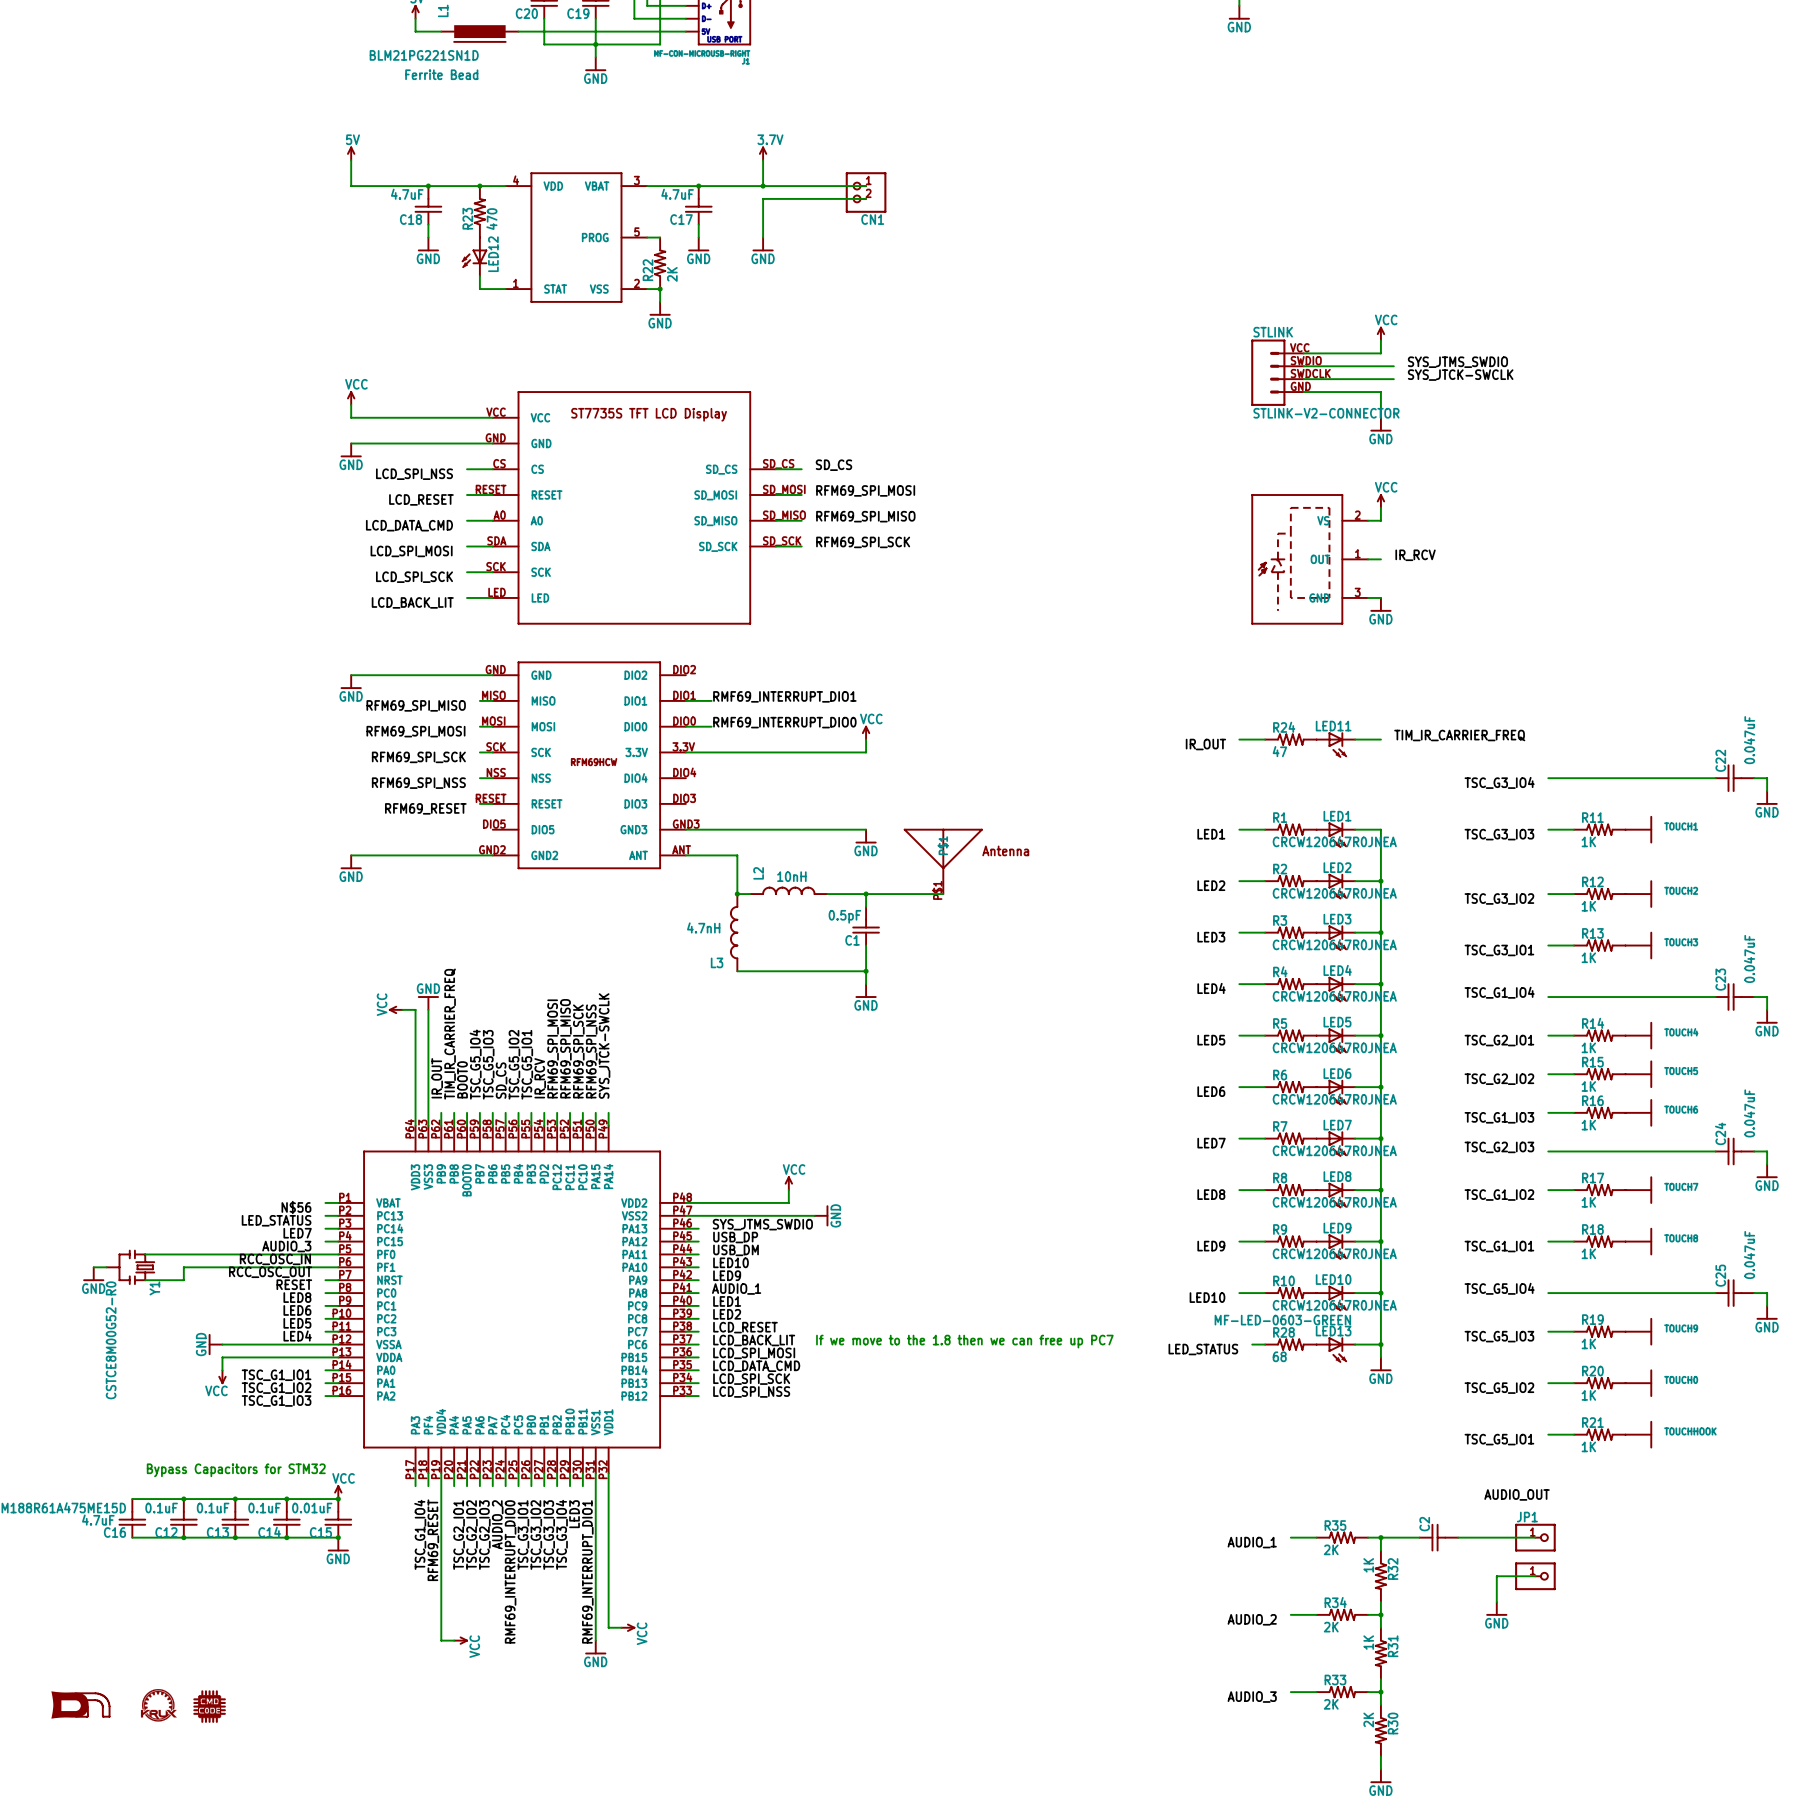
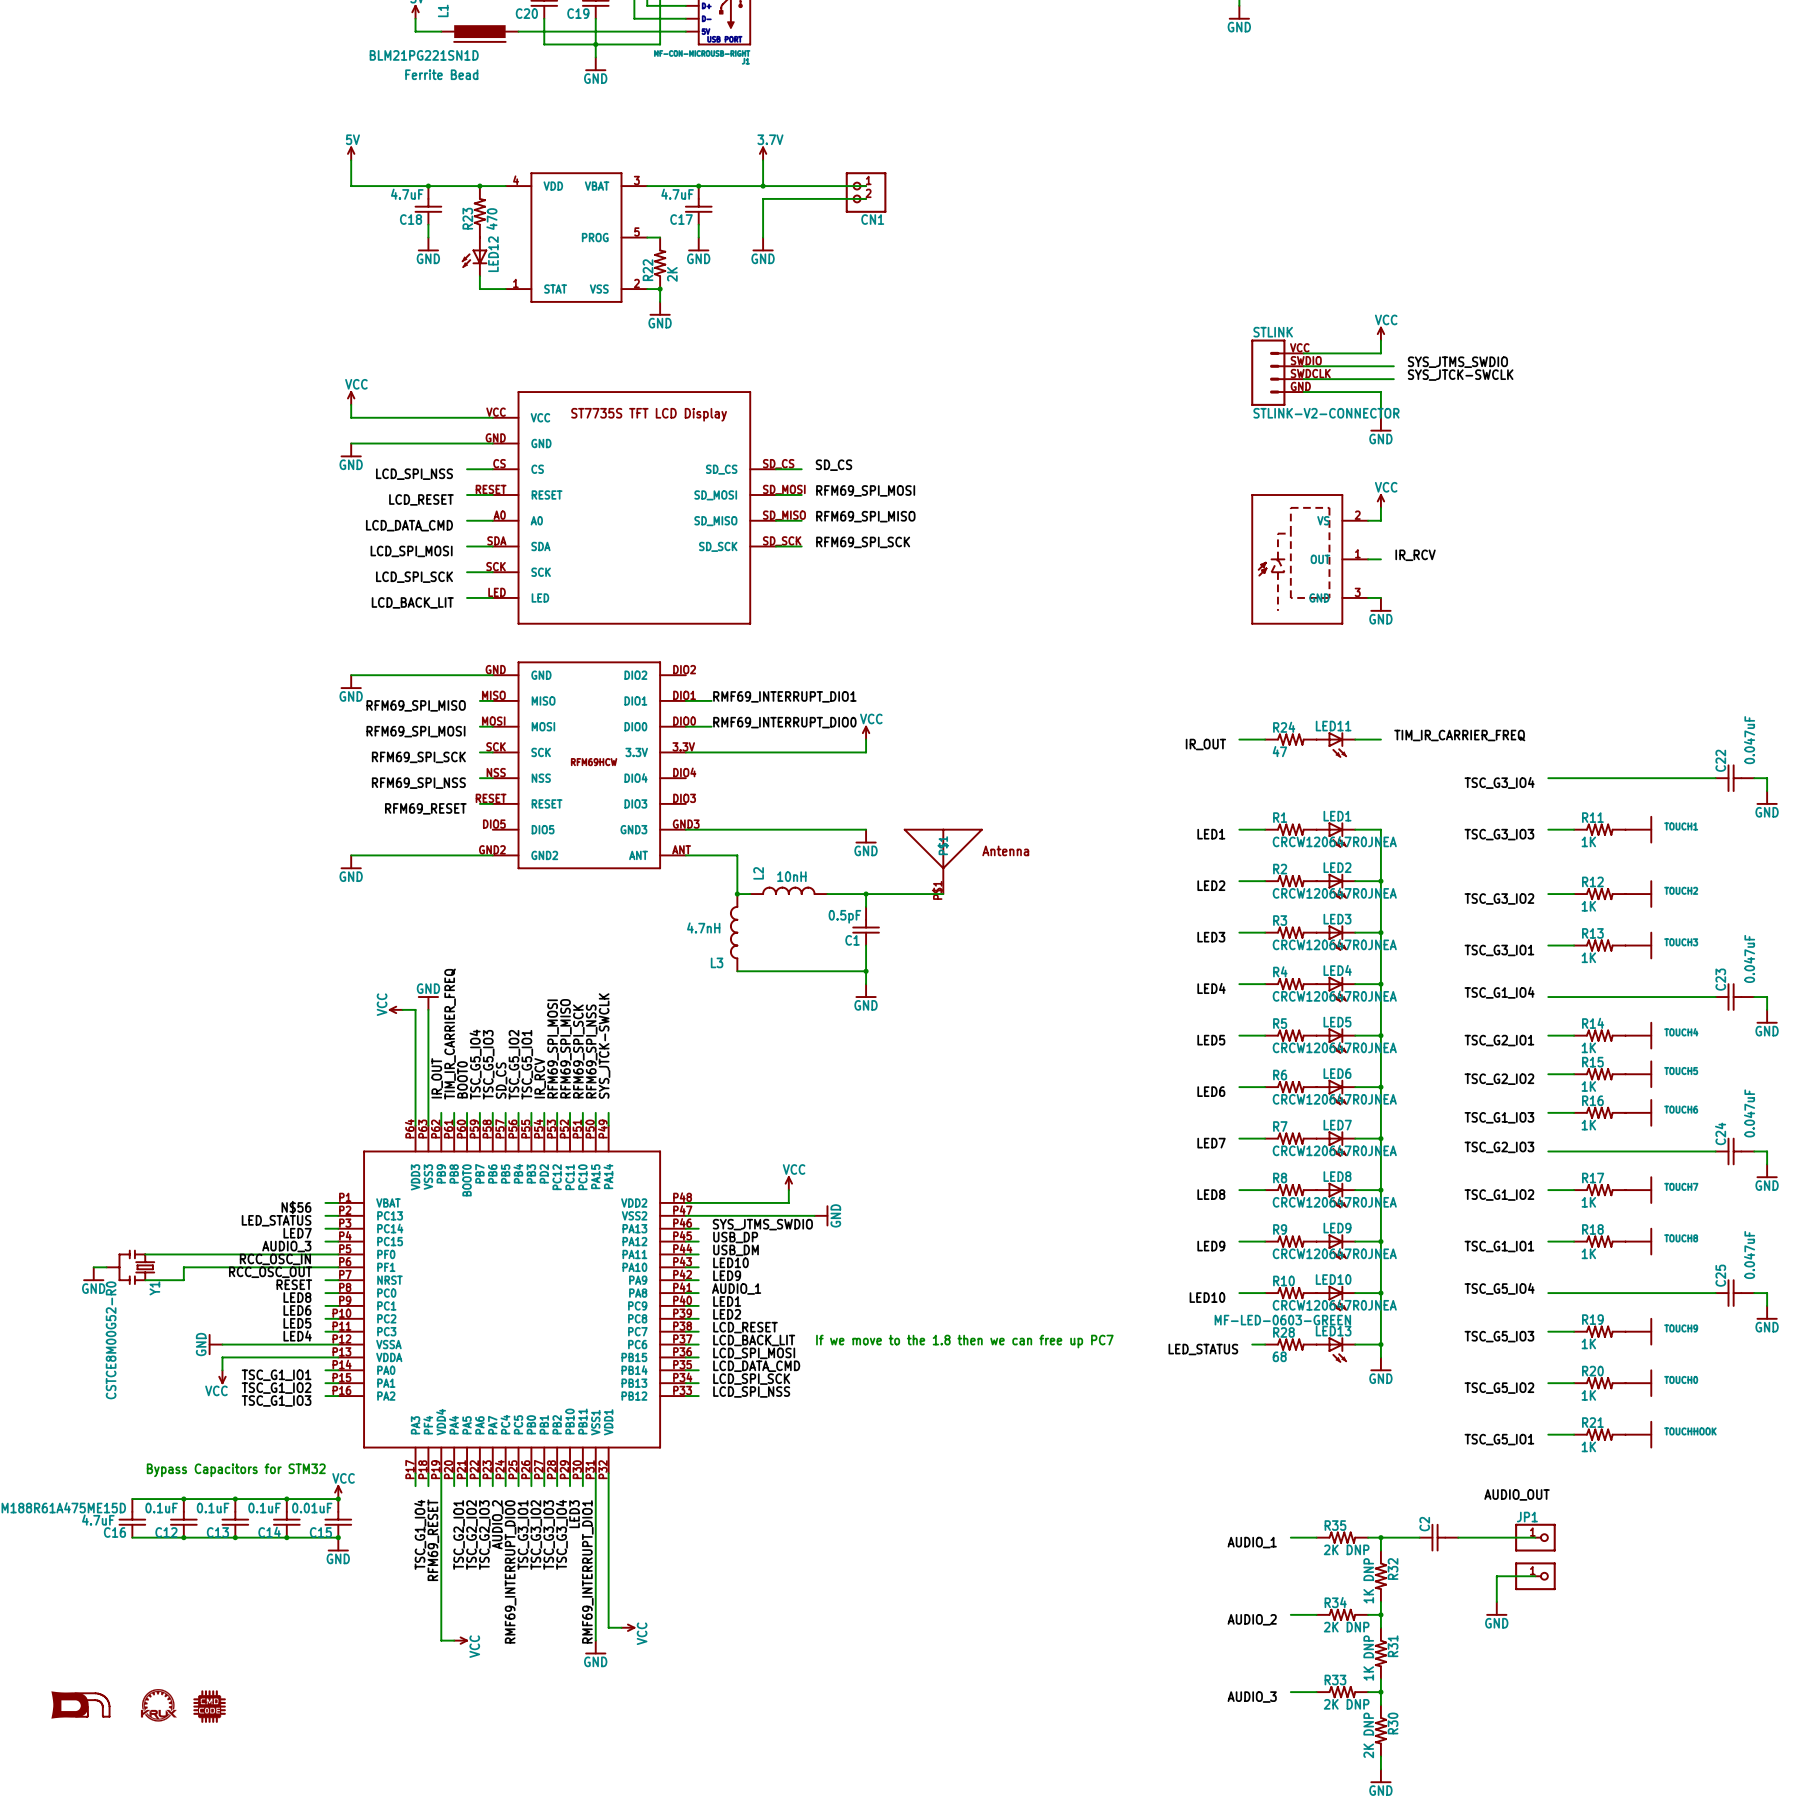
R35 value: 2K (1331, 1549) -> 2K DNP (1346, 1549)
R32 value: 1K (1368, 1565) -> 1K DNP (1368, 1580)
R34 value: 2K (1331, 1627) -> 2K DNP (1346, 1627)
R31 value: 1K (1368, 1642) -> 1K DNP (1368, 1658)
R33 value: 2K (1331, 1704) -> 2K DNP (1346, 1704)
R30 value: 2K (1368, 1720) -> 2K DNP (1368, 1735)

